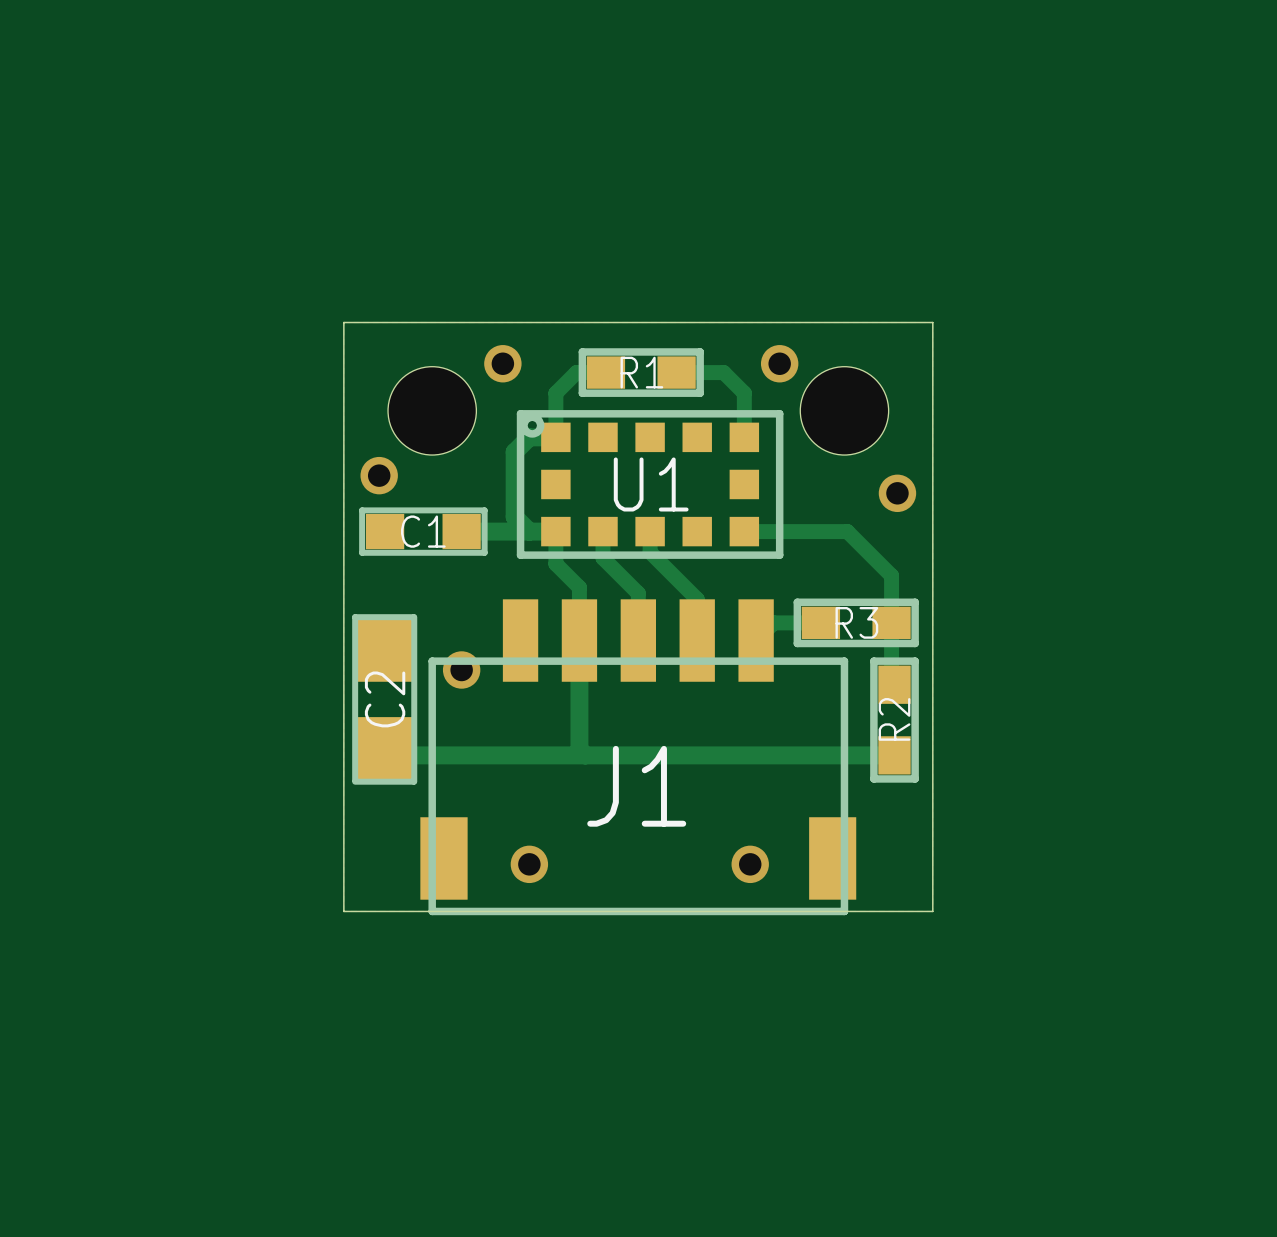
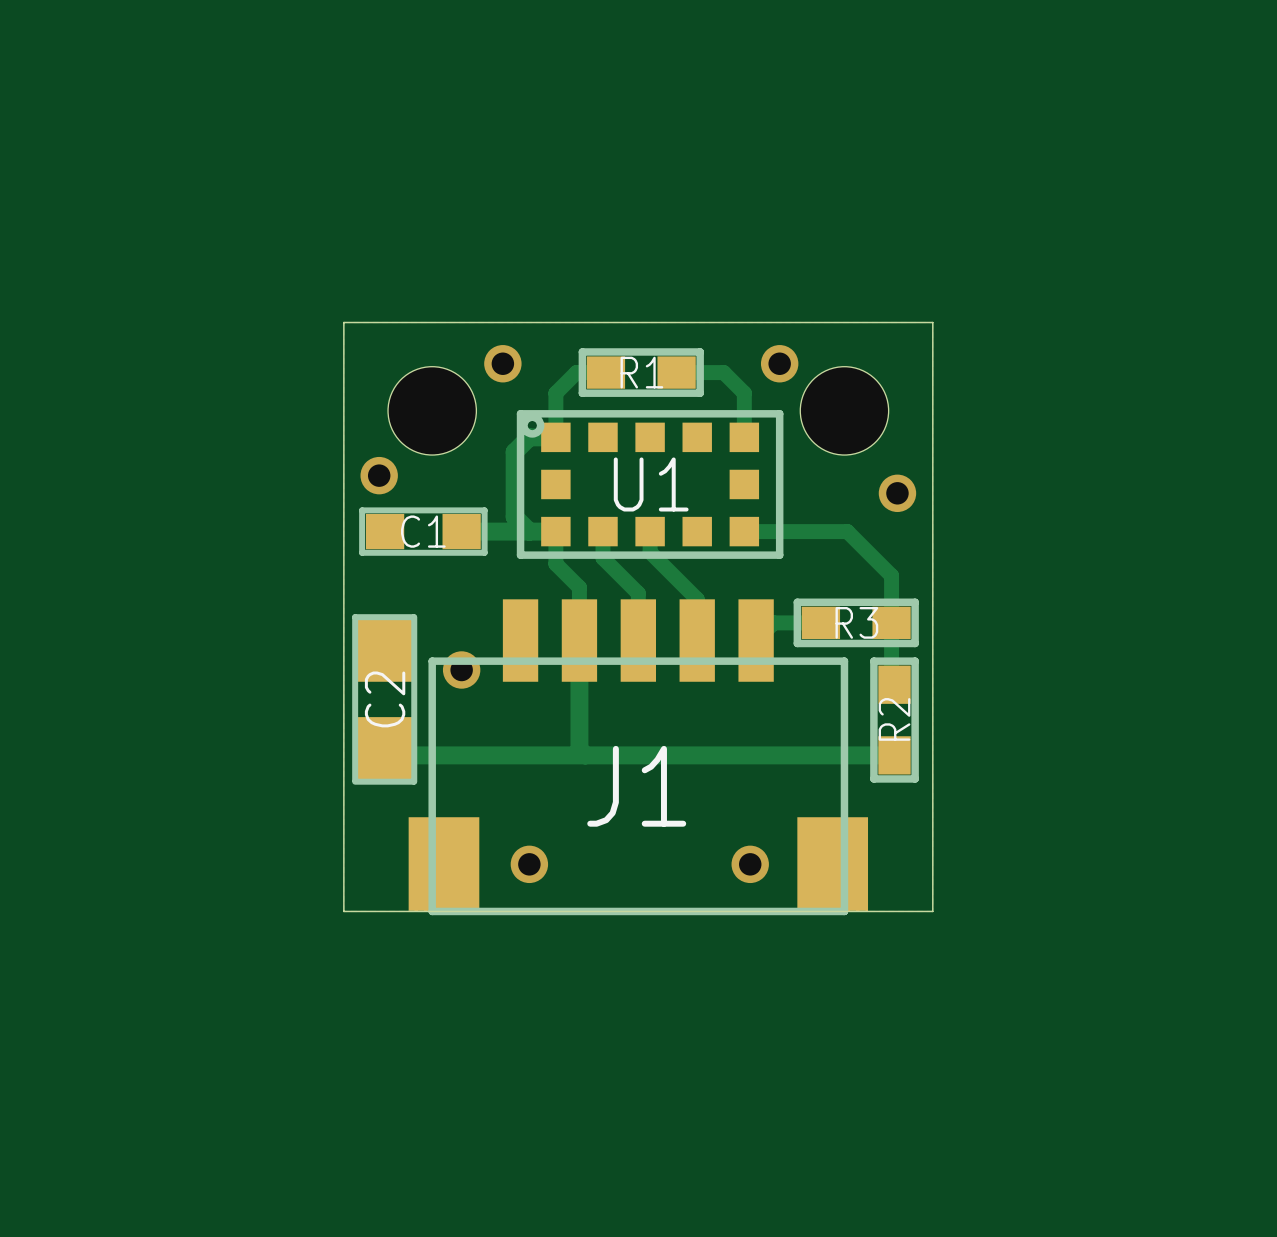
J1 footprint: [420, 599, 857, 916] -> [408, 599, 869, 916]

